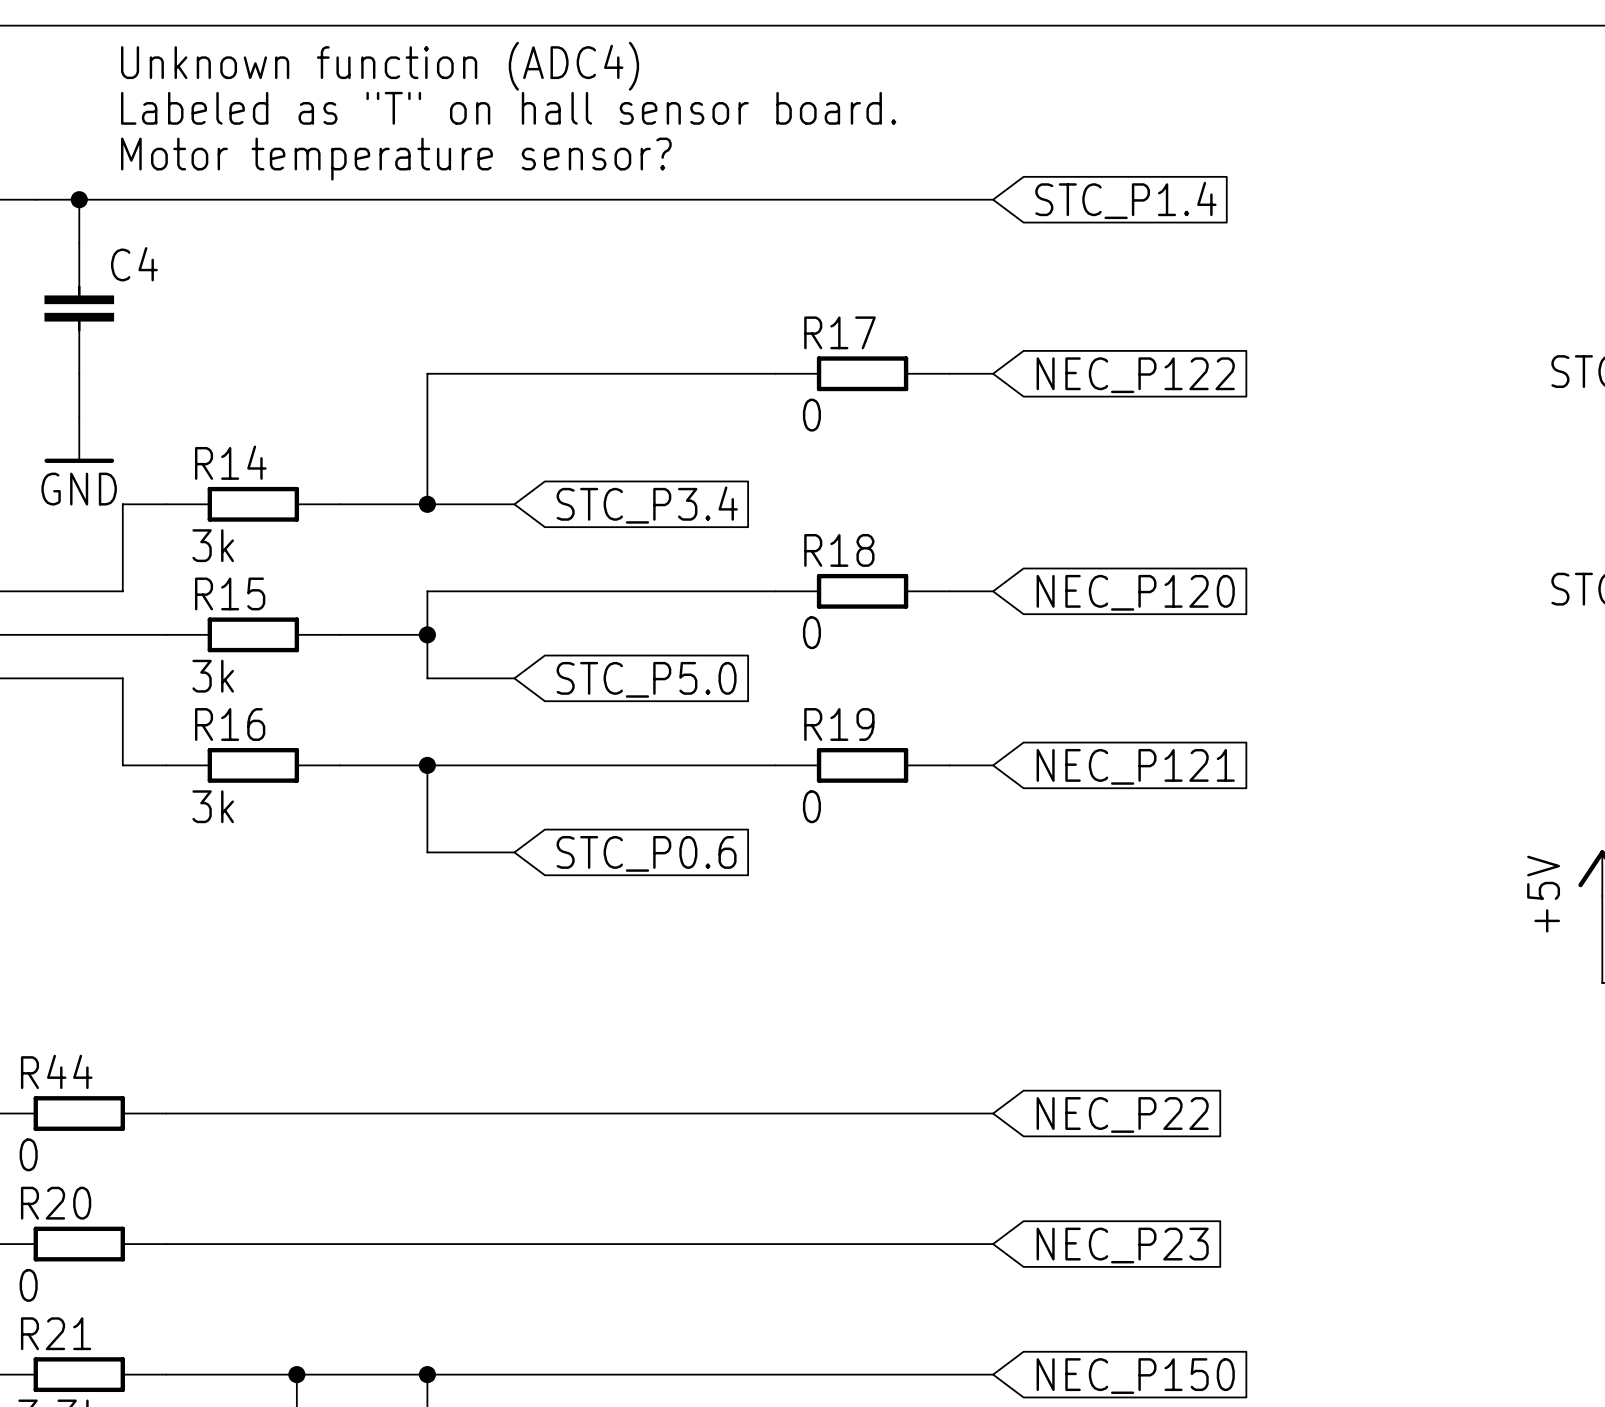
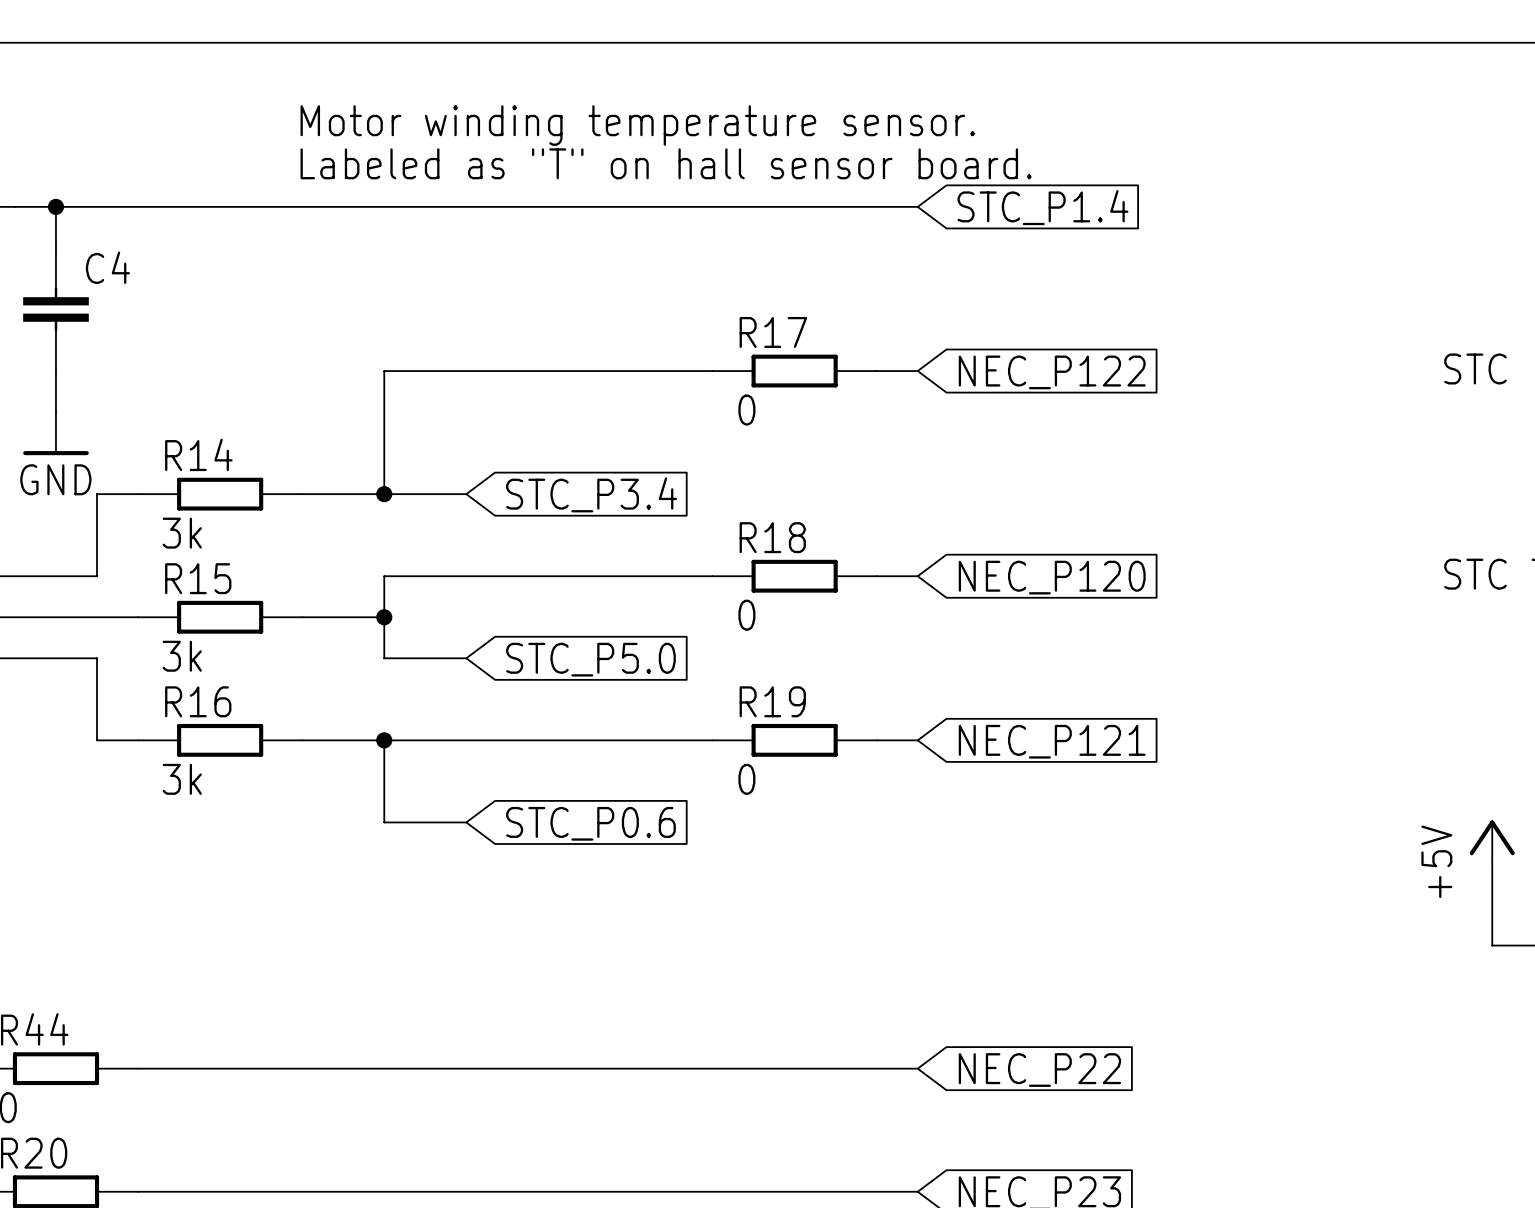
text: Unknown function (ADC4) (380, 66) -> none
text position: Labeled as "T" on hall sensor board. (508, 108) -> Labeled as "T" on hall sensor board. (666, 163)
text: Motor temperature sensor? (396, 159) -> Motor winding temperature sensor. (637, 125)

